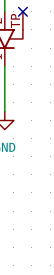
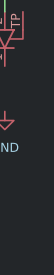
no-connect mark: (22, 11) -> none
wire: (4, 66) (4, 111) -> none

